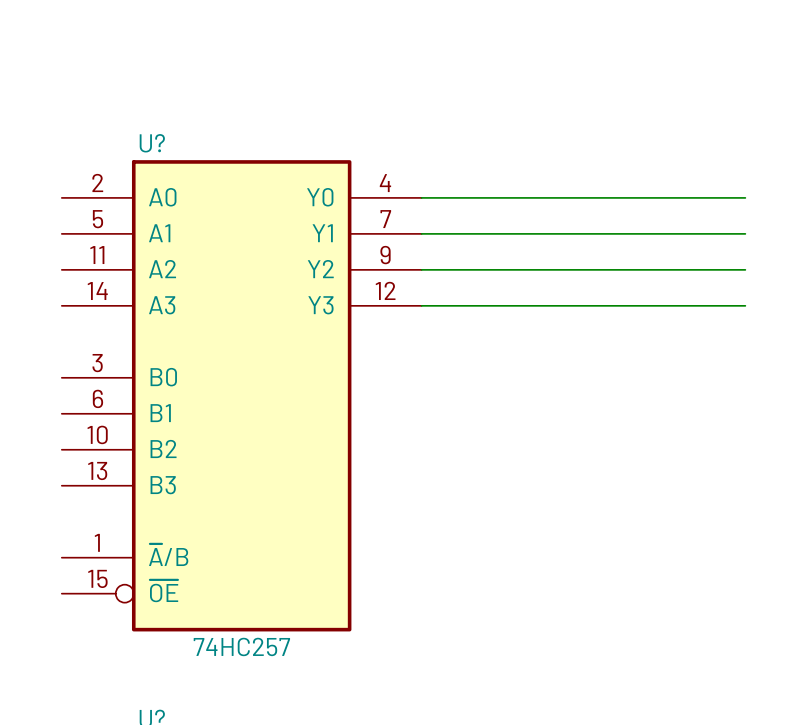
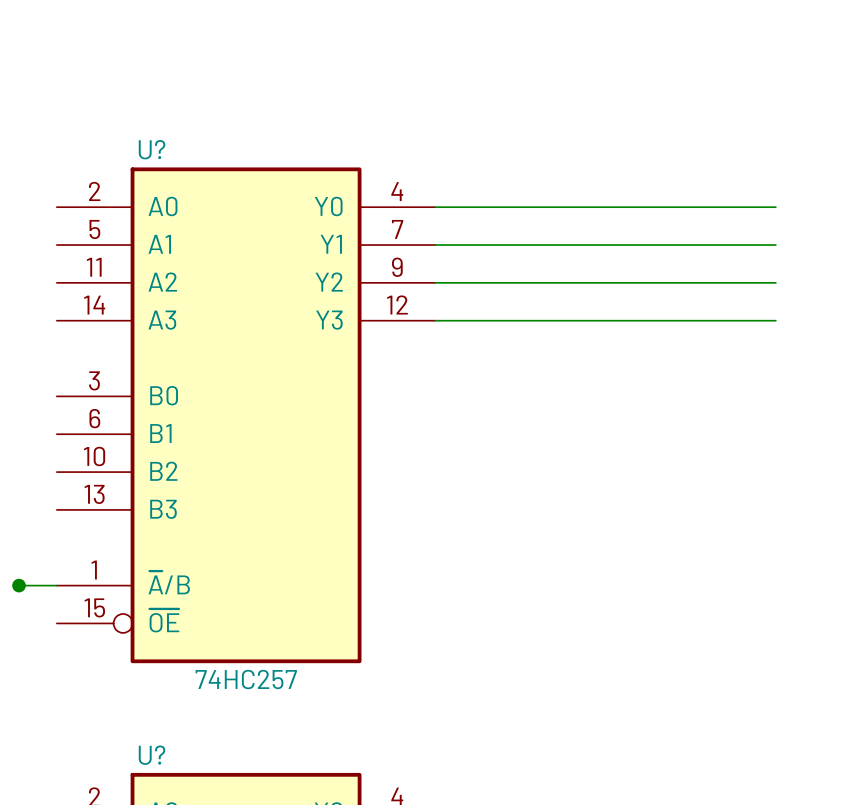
wire: none -> (19, 585) (56, 585)
junction: none -> (19, 585)

